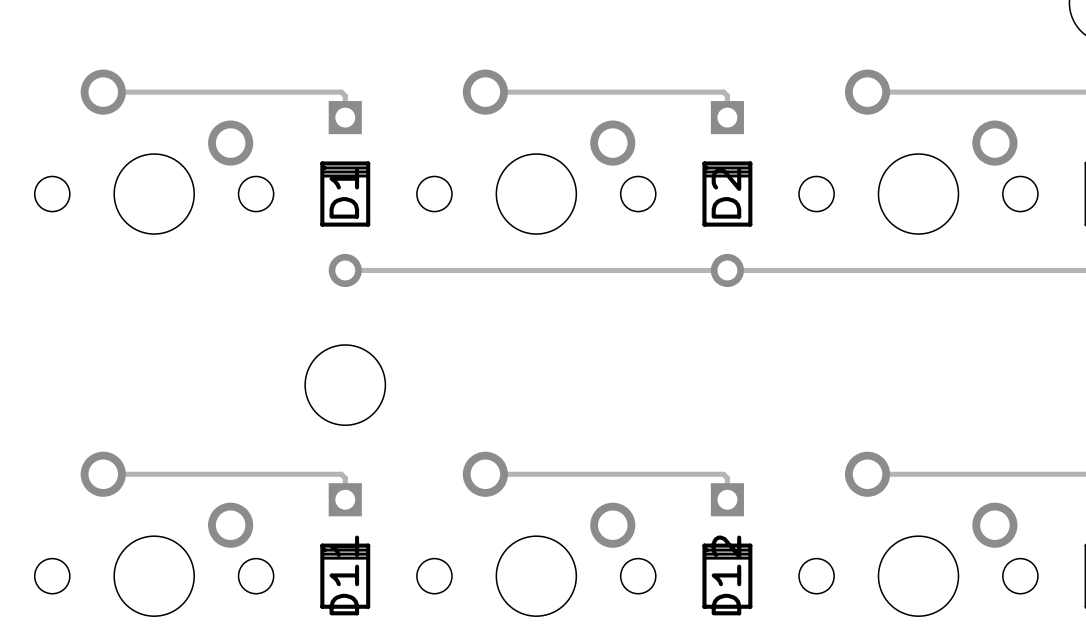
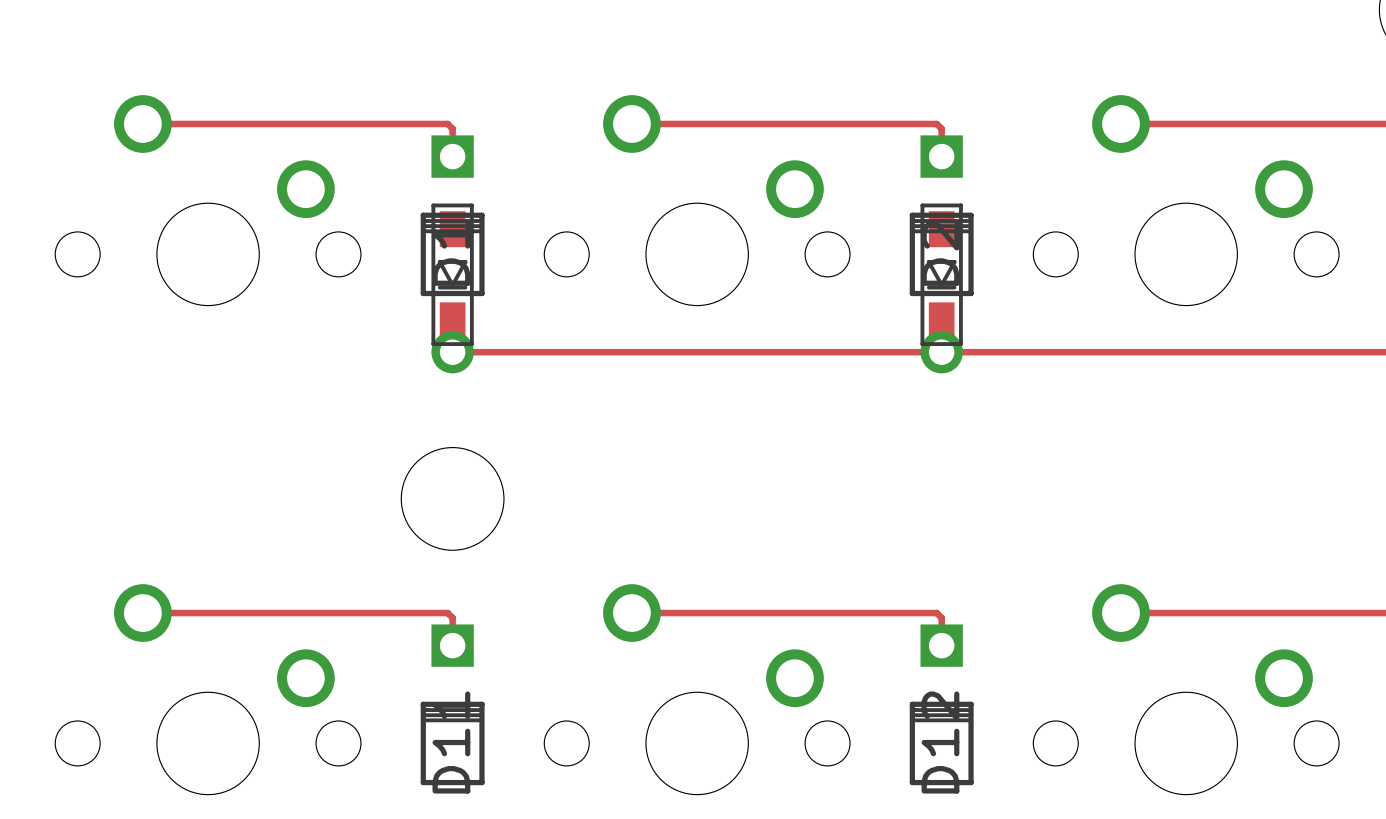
part: none -> (452, 274)
part: none -> (941, 274)

